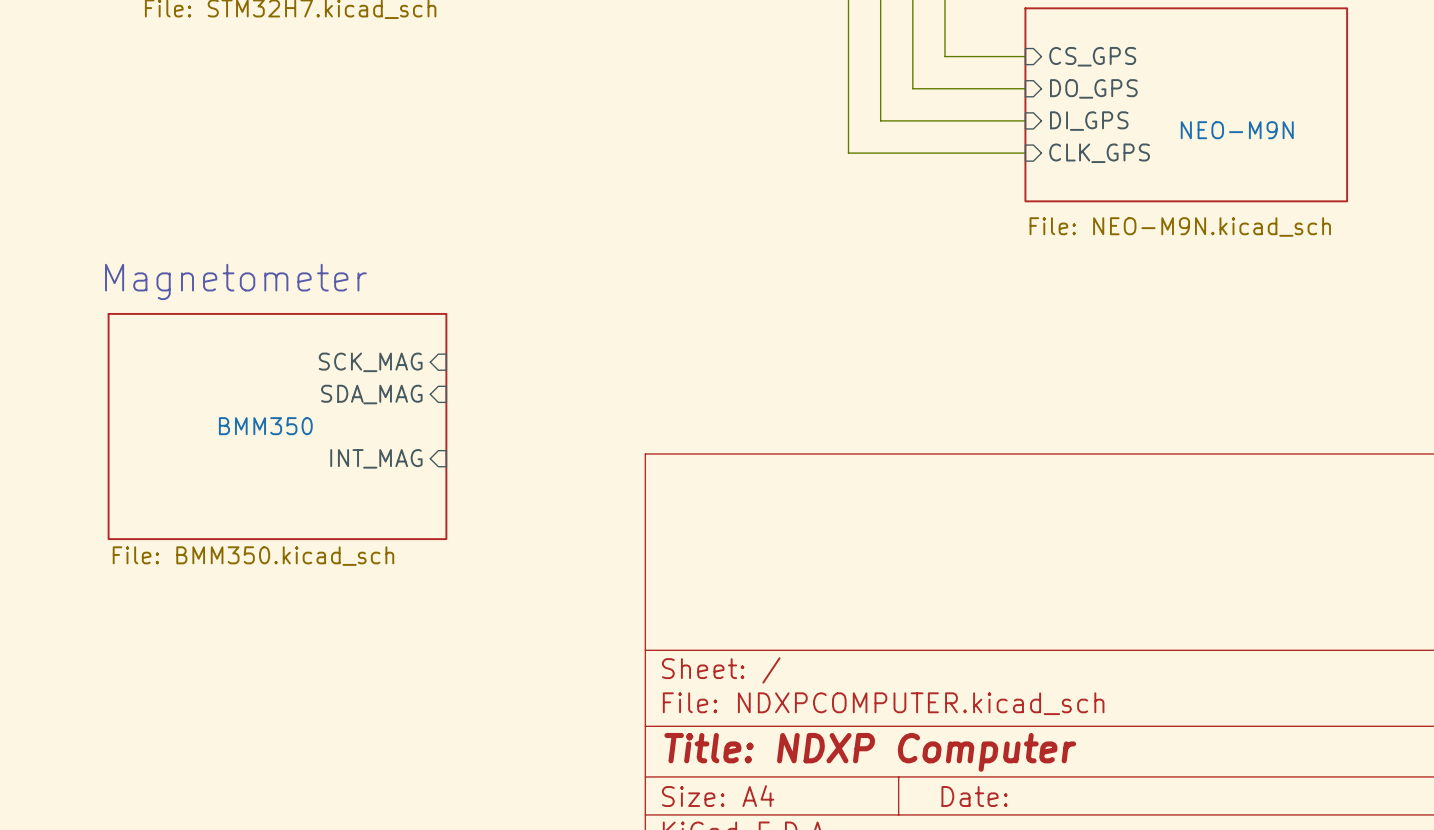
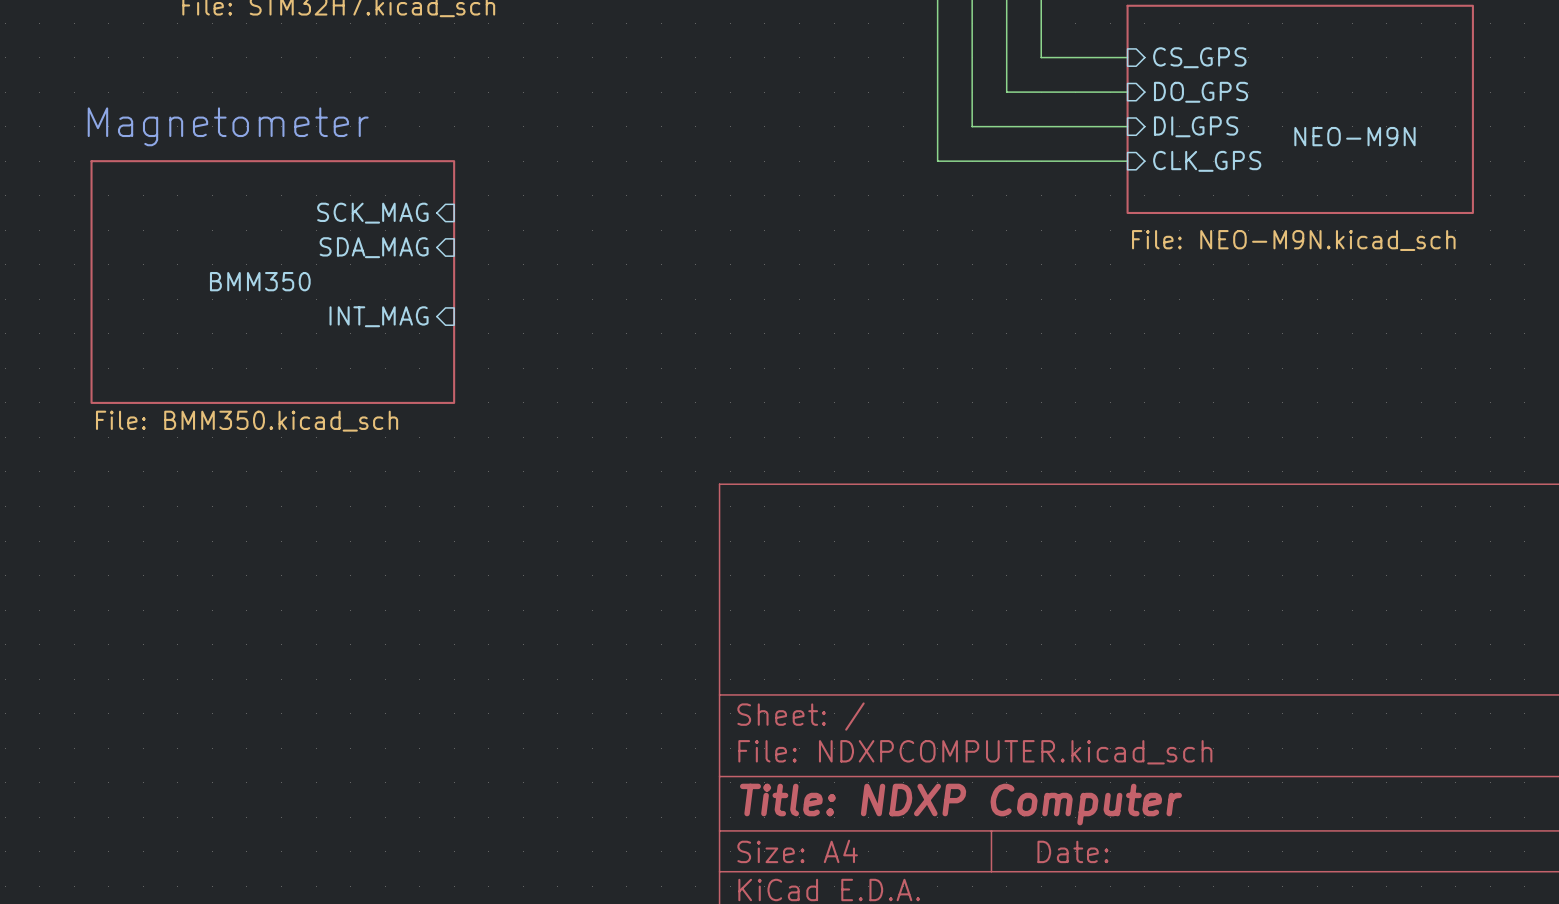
text position: Magnetometer (235, 281) -> Magnetometer (228, 126)
sheet pin position: SCK_MAG (370, 362) -> SCK_MAG (372, 213)
sheet pin position: SDA_MAG (371, 394) -> SDA_MAG (374, 247)
sheet BMM350 position: (277, 426) -> (272, 282)
sheet pin position: INT_MAG (376, 458) -> INT_MAG (379, 316)

